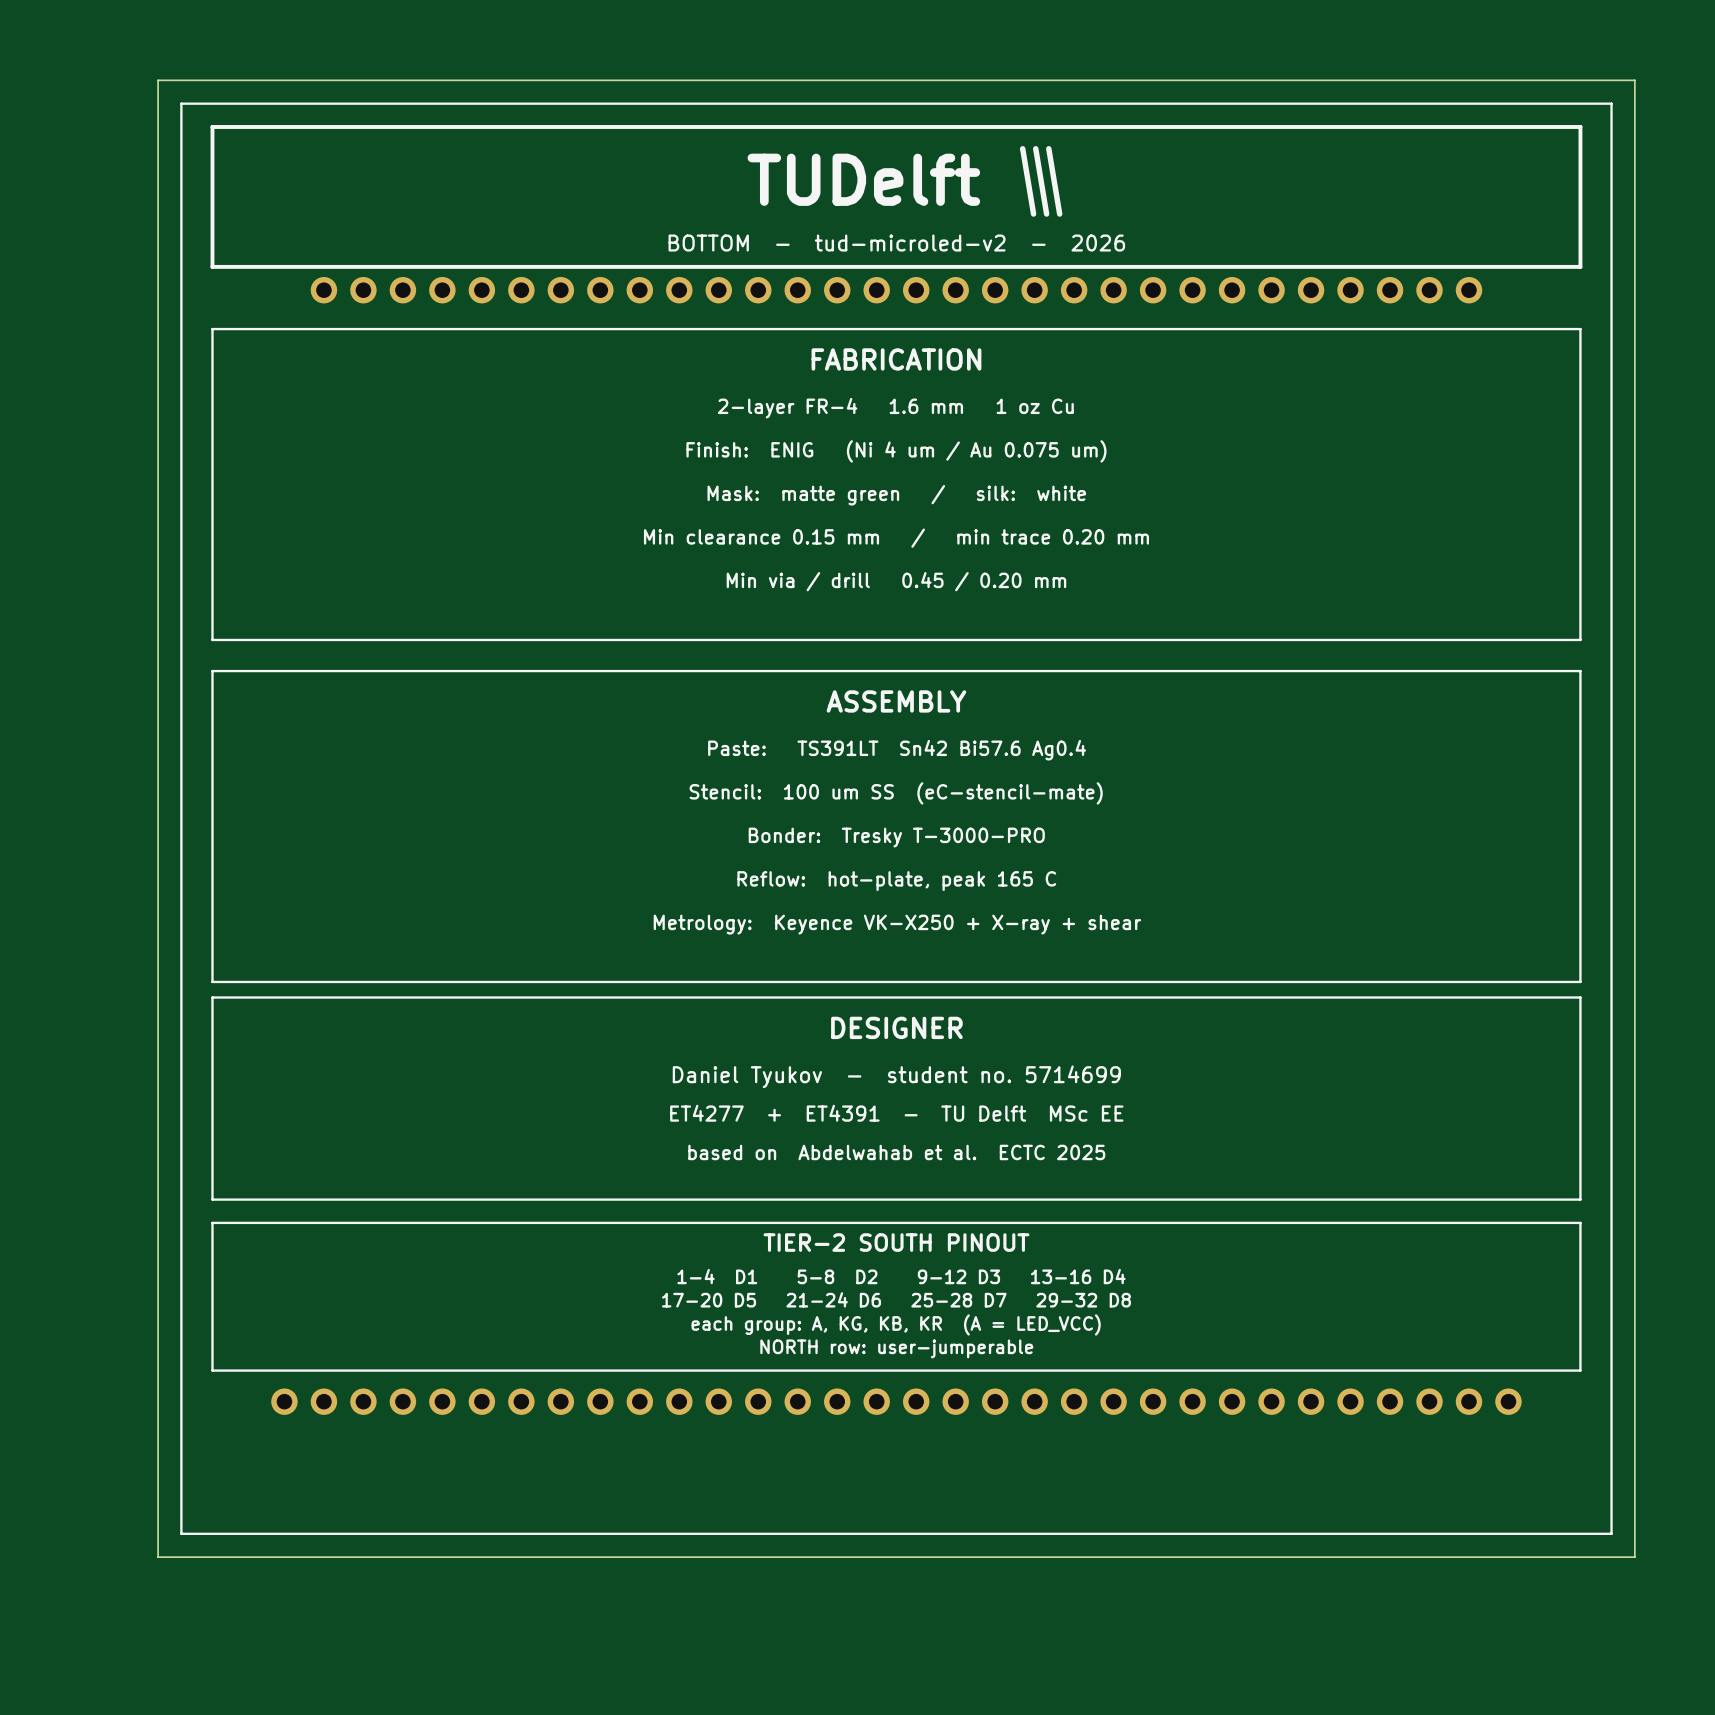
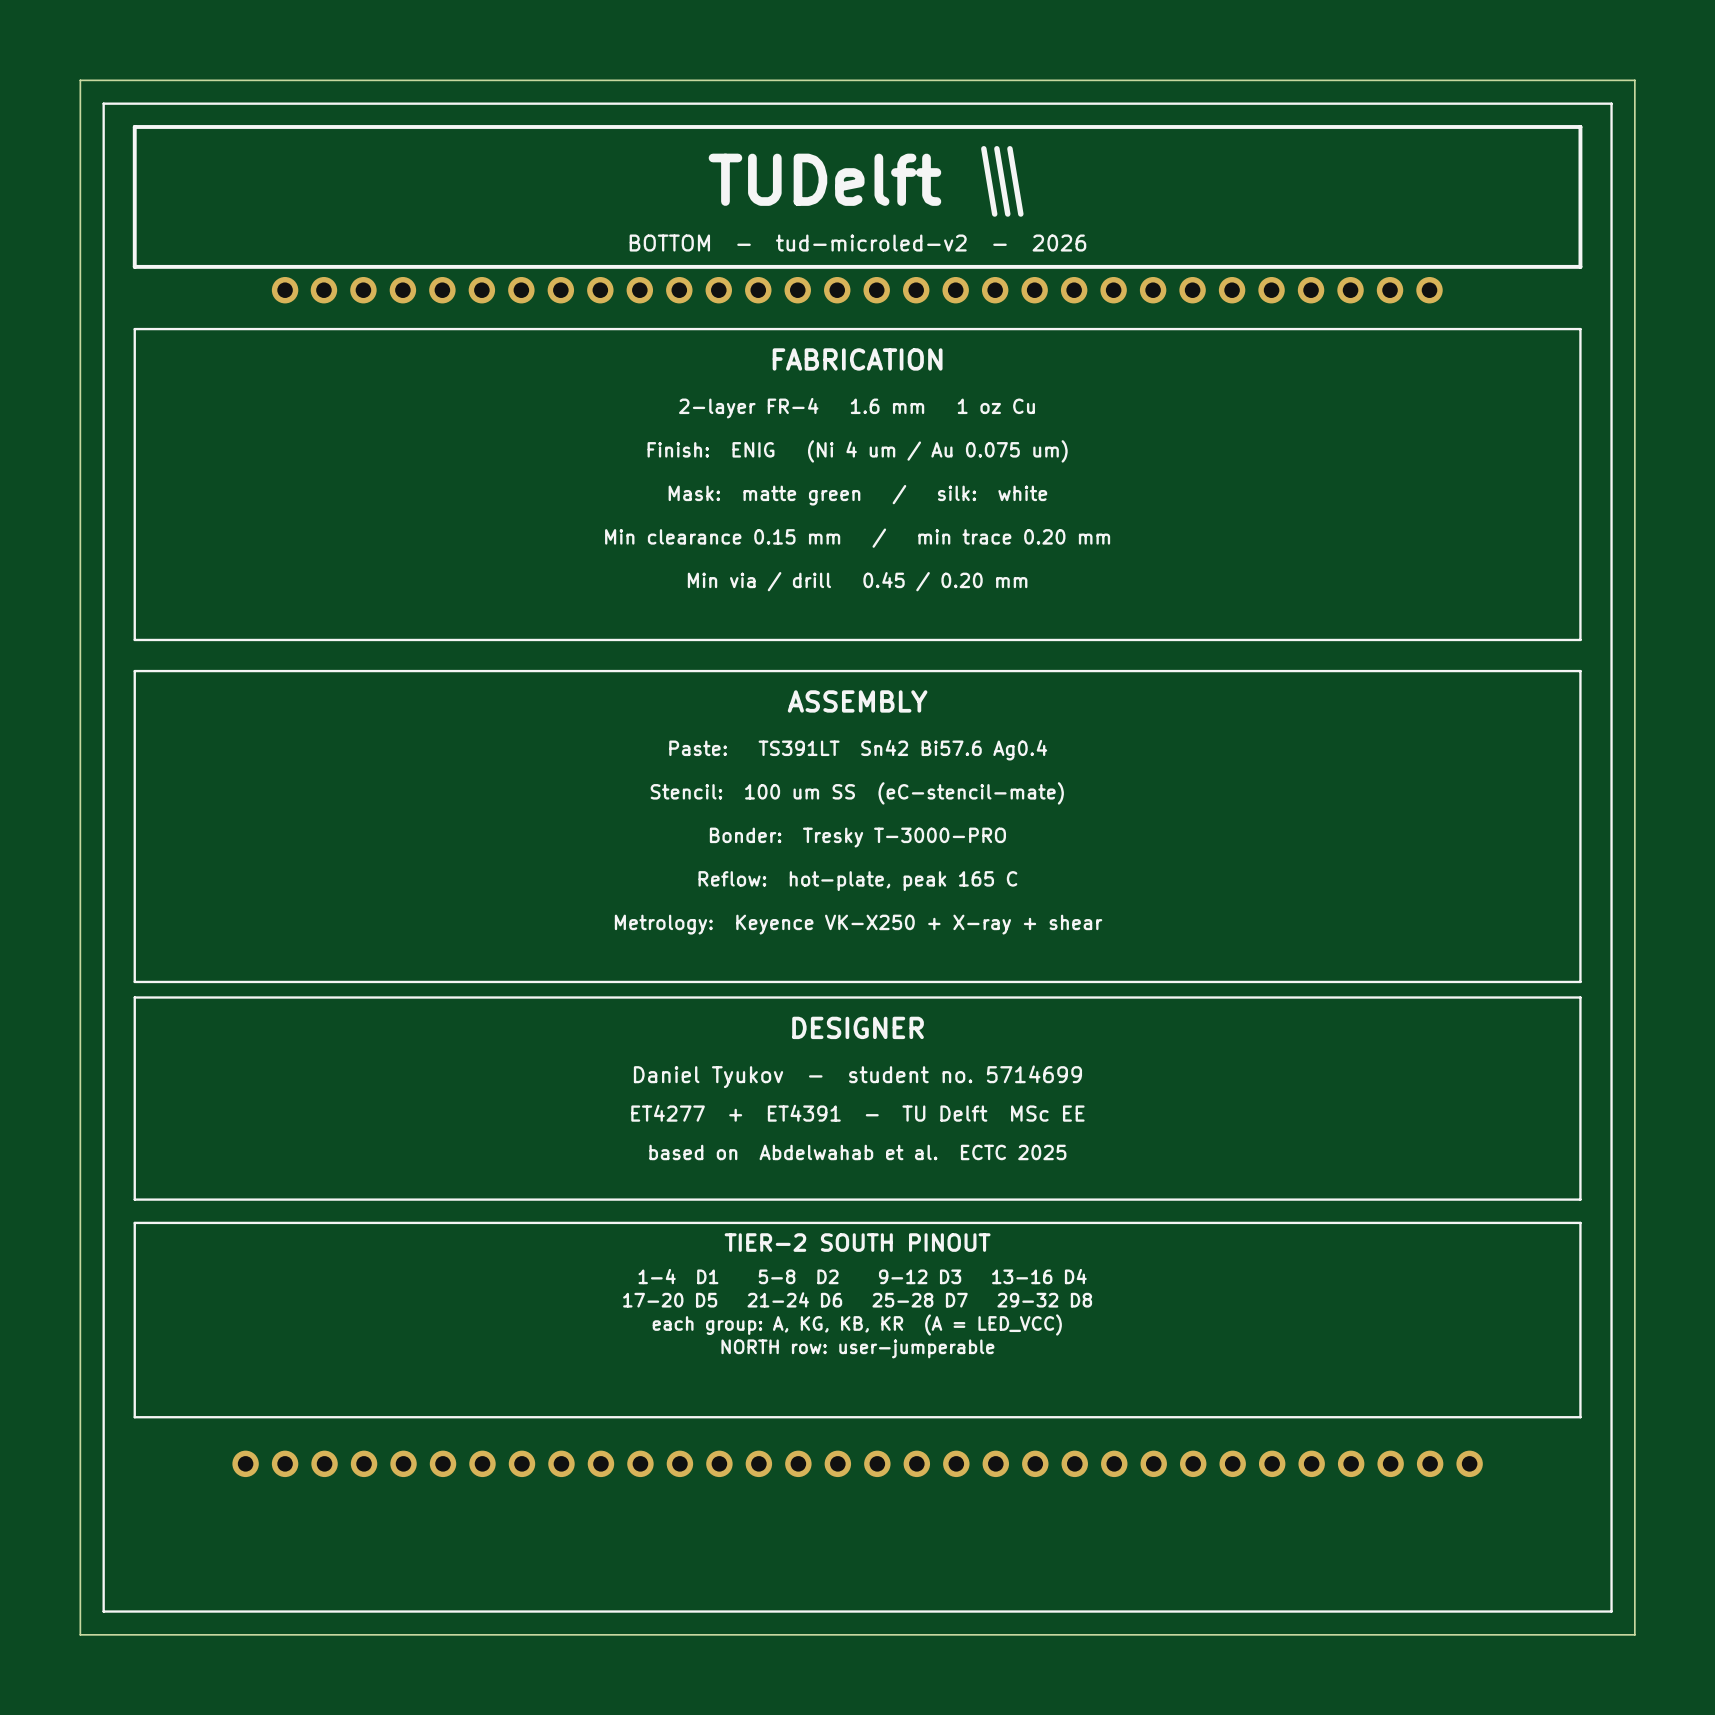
board edge: (158, 80) (158, 1557) (1634, 1557) -> (158, 80) (80, 80) (80, 1634) (1634, 1634) (1634, 1557)
line: (181, 103) (181, 1533) (1611, 1533) -> (181, 103) (103, 103) (103, 1611) (1611, 1611) (1611, 1533)
line: (212, 126) (212, 266) -> (212, 126) (134, 126) (134, 266) (212, 266)
line: (1022, 148) (1033, 214) -> (983, 148) (994, 214)
line: (1035, 148) (1046, 214) -> (996, 148) (1007, 214)
line: (1048, 148) (1059, 214) -> (1009, 148) (1020, 214)
text position: TUDelft (863, 179) -> TUDelft (824, 179)
text position: BOTTOM - tud-microled-v2 - 2026 (896, 243) -> BOTTOM - tud-microled-v2 - 2026 (857, 243)
part: none -> (285, 290)
part: (1468, 290) -> none
line: (212, 329) (212, 639) -> (212, 329) (134, 329) (134, 639) (212, 639)
text position: FABRICATION (896, 359) -> FABRICATION (857, 359)
text position: 2-layer FR-4 1.6 mm 1 oz Cu (895, 408) -> 2-layer FR-4 1.6 mm 1 oz Cu (856, 408)
text position: Finish: ENIG (Ni 4 um / Au 0.075 um) (896, 451) -> Finish: ENIG (Ni 4 um / Au 0.075 um) (857, 451)
text position: Mask: matte green / silk: white (896, 495) -> Mask: matte green / silk: white (857, 495)
text position: Min clearance 0.15 mm / min trace 0.20 mm (896, 538) -> Min clearance 0.15 mm / min trace 0.20 mm (857, 538)
text position: Min via / drill 0.45 / 0.20 mm (896, 581) -> Min via / drill 0.45 / 0.20 mm (857, 581)
line: (212, 671) (212, 981) -> (212, 671) (134, 671) (134, 981) (212, 981)
text position: ASSEMBLY (896, 701) -> ASSEMBLY (857, 701)
text position: Paste: TS391LT Sn42 Bi57.6 Ag0.4 (897, 750) -> Paste: TS391LT Sn42 Bi57.6 Ag0.4 (858, 750)
text position: Stencil: 100 um SS (eC-stencil-mate) (896, 793) -> Stencil: 100 um SS (eC-stencil-mate) (857, 793)
text position: Bonder: Tresky T-3000-PRO (896, 837) -> Bonder: Tresky T-3000-PRO (857, 837)
text position: Reflow: hot-plate, peak 165 C (896, 881) -> Reflow: hot-plate, peak 165 C (857, 881)
text position: Metrology: Keyence VK-X250 + X-ray + shear (897, 924) -> Metrology: Keyence VK-X250 + X-ray + shear (858, 924)
line: (212, 997) (212, 1199) -> (212, 997) (134, 997) (134, 1199) (212, 1199)
text position: DESIGNER (896, 1027) -> DESIGNER (858, 1027)
text position: Daniel Tyukov - student no. 5714699 (896, 1076) -> Daniel Tyukov - student no. 5714699 (857, 1076)
text position: ET4277 + ET4391 - TU Delft MSc EE (896, 1113) -> ET4277 + ET4391 - TU Delft MSc EE (857, 1113)
text position: based on Abdelwahab et al. ECTC 2025 (896, 1152) -> based on Abdelwahab et al. ECTC 2025 (857, 1152)
line: (212, 1222) (212, 1370) (1580, 1370) -> (212, 1222) (134, 1222) (134, 1417) (1580, 1417) (1580, 1370)
text position: TIER-2 SOUTH PINOUT (896, 1242) -> TIER-2 SOUTH PINOUT (857, 1242)
text position: 1-4 D1 5-8 D2 9-12 D3 13-16 D4 (901, 1276) -> 1-4 D1 5-8 D2 9-12 D3 13-16 D4 (862, 1276)
text position: 17-20 D5 21-24 D6 25-28 D7 29-32 D8 (896, 1299) -> 17-20 D5 21-24 D6 25-28 D7 29-32 D8 (857, 1299)
text position: each group: A, KG, KB, KR (A = LED_VCC) (896, 1324) -> each group: A, KG, KB, KR (A = LED_VCC) (857, 1324)
text position: NORTH row: user-jumperable (896, 1348) -> NORTH row: user-jumperable (857, 1348)
part: (284, 1401) -> none
part: (323, 1401) -> none
part: (363, 1401) -> none
part: (402, 1401) -> none
part: (442, 1401) -> none
part: (481, 1401) -> none
part: (521, 1401) -> none
part: (560, 1401) -> none
part: (600, 1401) -> none
part: (639, 1401) -> none
part: (679, 1401) -> none
part: (718, 1401) -> none
part: (758, 1401) -> none
part: (797, 1401) -> none
part: (837, 1401) -> none
part: (876, 1401) -> none
part: (916, 1401) -> none
part: (955, 1401) -> none
part: (995, 1401) -> none
part: (1034, 1401) -> none
part: (1074, 1401) -> none
part: (1113, 1401) -> none
part: (1153, 1401) -> none
part: (1192, 1401) -> none
part: (1232, 1401) -> none
part: (1271, 1401) -> none
part: (1311, 1401) -> none
part: (1350, 1401) -> none
part: (1390, 1401) -> none
part: (1429, 1401) -> none
part: (1468, 1401) -> none
part: (1508, 1401) -> none
part: none -> (245, 1463)
part: none -> (285, 1463)
part: none -> (324, 1463)
part: none -> (364, 1463)
part: none -> (403, 1463)
part: none -> (443, 1463)
part: none -> (482, 1463)
part: none -> (521, 1463)
part: none -> (561, 1463)
part: none -> (600, 1463)
part: none -> (640, 1463)
part: none -> (679, 1463)
part: none -> (719, 1463)
part: none -> (758, 1463)
part: none -> (798, 1463)
part: none -> (837, 1463)
part: none -> (877, 1463)
part: none -> (916, 1463)
part: none -> (956, 1463)
part: none -> (995, 1463)
part: none -> (1035, 1463)
part: none -> (1074, 1463)
part: none -> (1114, 1463)
part: none -> (1153, 1463)
part: none -> (1193, 1463)
part: none -> (1232, 1463)
part: none -> (1272, 1463)
part: none -> (1311, 1463)
part: none -> (1351, 1463)
part: none -> (1390, 1463)
part: none -> (1430, 1463)
part: none -> (1469, 1463)

